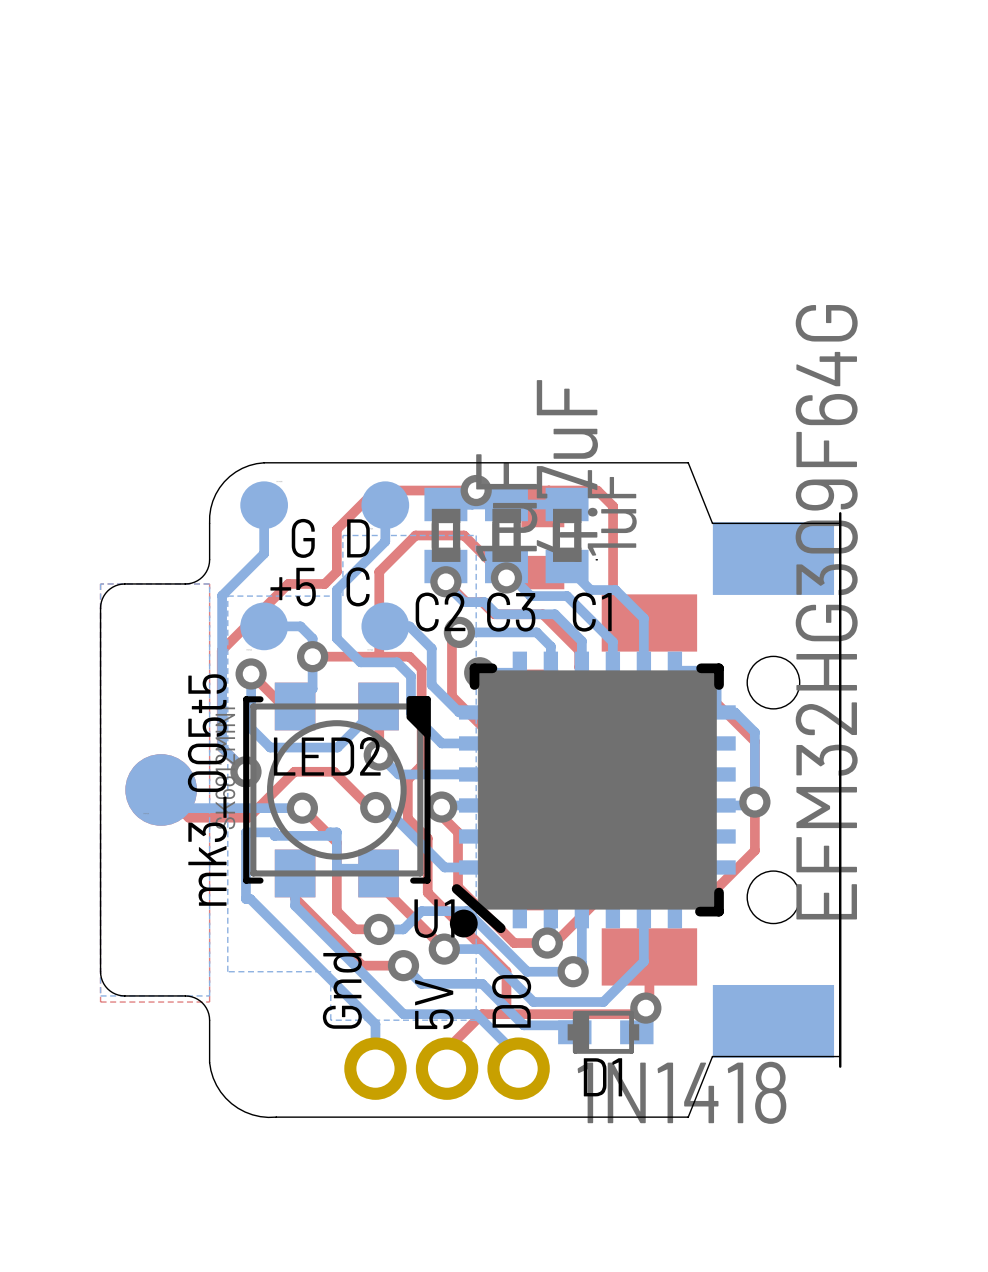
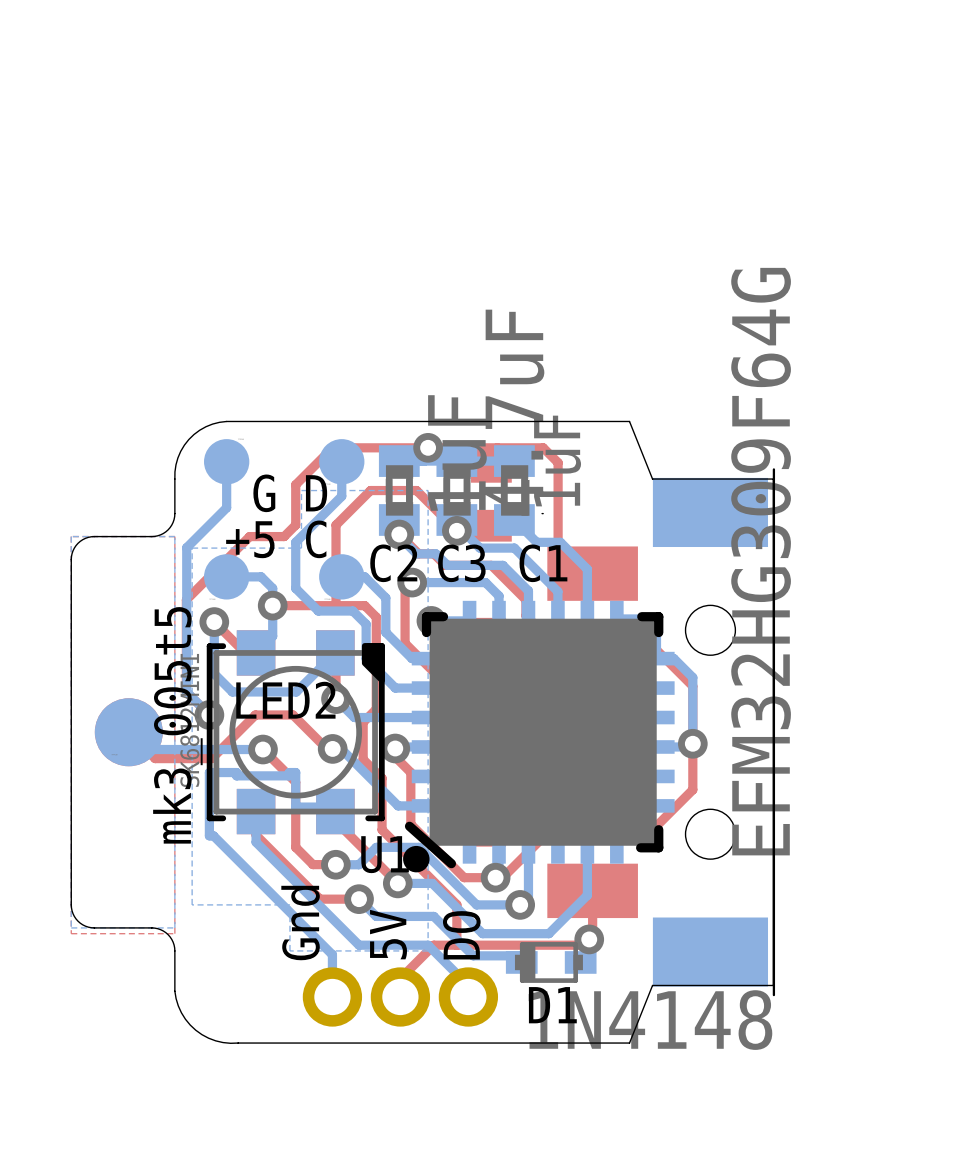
D1 value: 1N1418 (681, 1092) -> 1N4148 (650, 1020)

